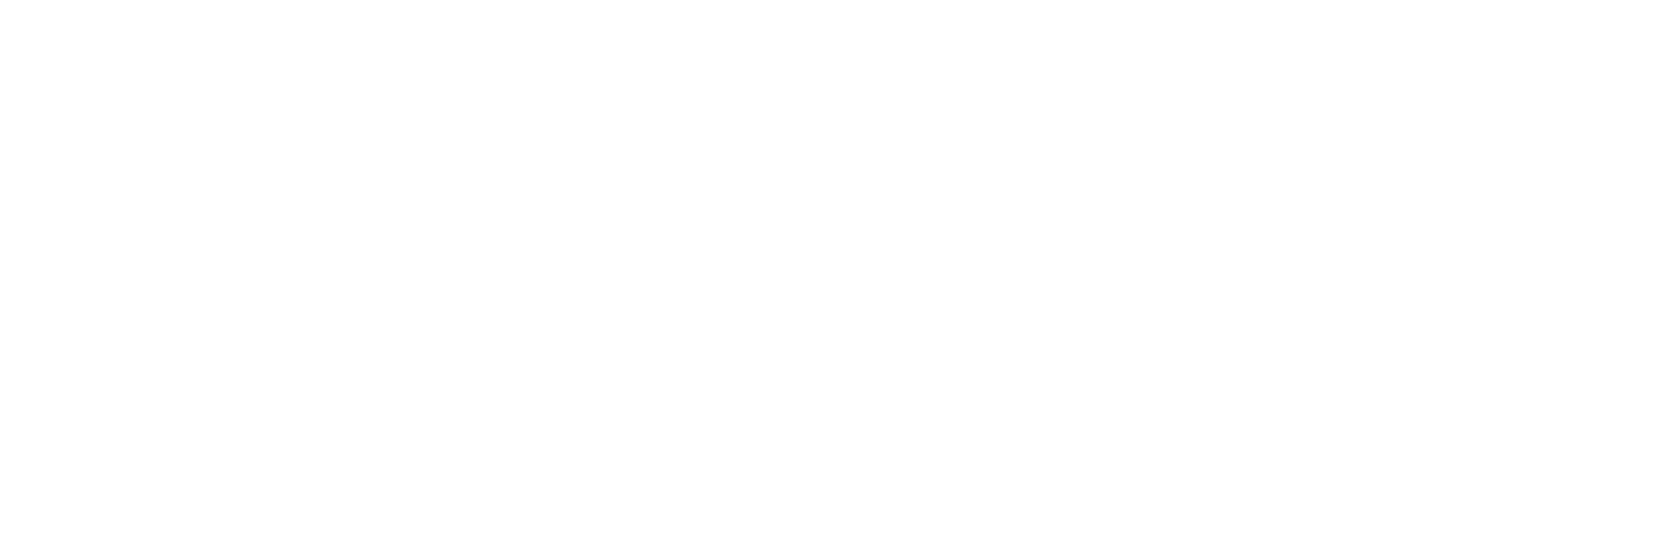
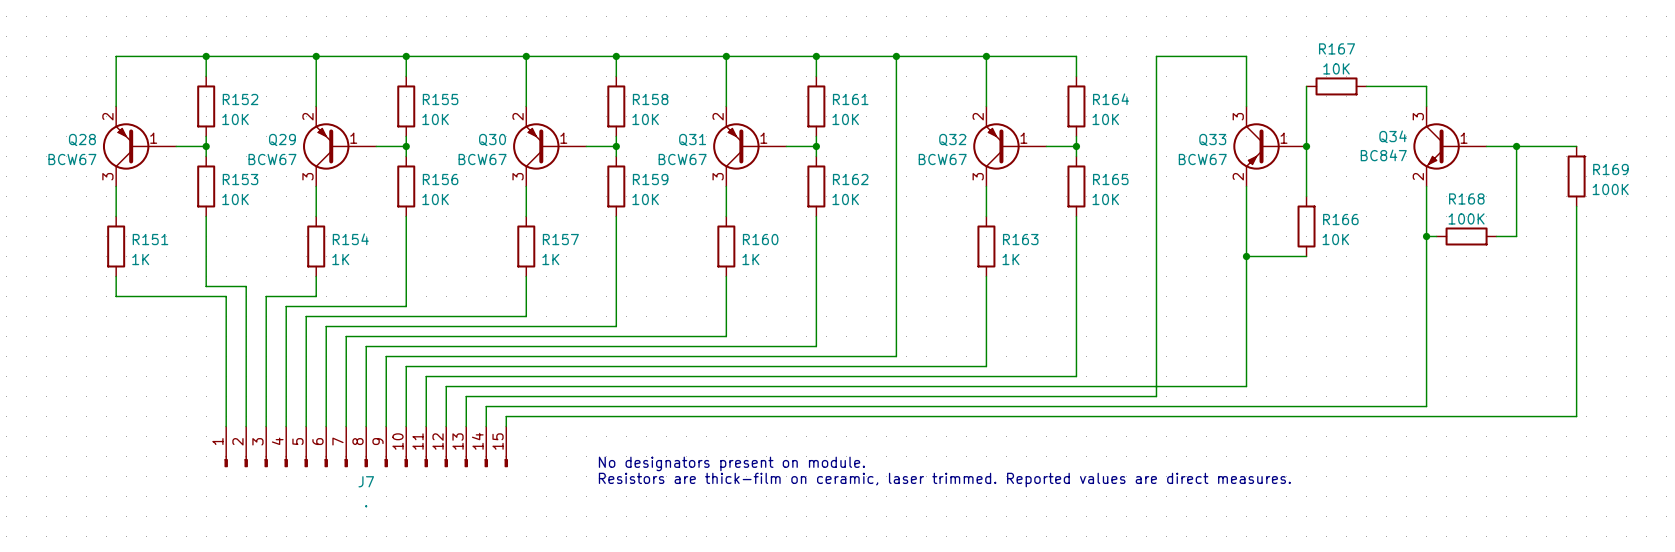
wire: none -> (206, 56) (206, 76)
junction: none -> (206, 56)
wire: none -> (316, 56) (316, 106)
junction: none -> (316, 56)
wire: none -> (406, 56) (406, 76)
junction: none -> (406, 56)
wire: none -> (526, 56) (526, 106)
junction: none -> (526, 56)
wire: none -> (616, 56) (616, 76)
junction: none -> (616, 56)
wire: none -> (726, 56) (726, 106)
junction: none -> (726, 56)
wire: none -> (816, 56) (816, 76)
junction: none -> (816, 56)
wire: none -> (896, 56) (896, 356) (386, 356) (386, 426)
junction: none -> (896, 56)
wire: none -> (986, 56) (986, 106)
junction: none -> (986, 56)
wire: none -> (1076, 76) (1076, 56) (116, 56) (116, 106)
wire: none -> (1306, 86) (1306, 196)
R167: none -> 10K (1336, 86)
wire: none -> (1366, 86) (1426, 86) (1426, 106)
R152: none -> 10K (206, 106)
R155: none -> 10K (406, 106)
R158: none -> 10K (616, 106)
R161: none -> 10K (816, 106)
R164: none -> 10K (1076, 106)
wire: none -> (1246, 106) (1246, 56) (1156, 56) (1156, 396) (466, 396) (466, 426)
wire: none -> (206, 136) (206, 156)
wire: none -> (406, 136) (406, 156)
wire: none -> (616, 136) (616, 156)
wire: none -> (816, 136) (816, 156)
wire: none -> (1076, 136) (1076, 156)
Q28: none -> BCW67 (139, 146)
wire: none -> (176, 146) (206, 146)
junction: none -> (206, 146)
Q29: none -> BCW67 (339, 146)
wire: none -> (376, 146) (406, 146)
junction: none -> (406, 146)
Q30: none -> BCW67 (549, 146)
wire: none -> (586, 146) (616, 146)
junction: none -> (616, 146)
Q31: none -> BCW67 (749, 146)
wire: none -> (786, 146) (816, 146)
junction: none -> (816, 146)
Q32: none -> BCW67 (1009, 146)
wire: none -> (1046, 146) (1076, 146)
junction: none -> (1076, 146)
Q33: none -> BCW67 (1269, 146)
junction: none -> (1306, 146)
Q34: none -> BC847 (1449, 146)
wire: none -> (1486, 146) (1576, 146)
wire: none -> (1516, 146) (1516, 236) (1496, 236)
junction: none -> (1516, 146)
R169: none -> 100K (1576, 176)
wire: none -> (116, 186) (116, 216)
R153: none -> 10K (206, 186)
wire: none -> (316, 186) (316, 216)
R156: none -> 10K (406, 186)
wire: none -> (526, 186) (526, 216)
R159: none -> 10K (616, 186)
wire: none -> (726, 186) (726, 216)
R162: none -> 10K (816, 186)
wire: none -> (986, 186) (986, 216)
R165: none -> 10K (1076, 186)
wire: none -> (1246, 186) (1246, 386) (446, 386) (446, 426)
wire: none -> (1426, 186) (1426, 406) (486, 406) (486, 426)
wire: none -> (1576, 206) (1576, 416) (506, 416) (506, 426)
wire: none -> (206, 216) (206, 286) (246, 286) (246, 426)
wire: none -> (406, 216) (406, 306) (286, 306) (286, 426)
wire: none -> (616, 216) (616, 326) (326, 326) (326, 426)
wire: none -> (816, 216) (816, 346) (366, 346) (366, 426)
wire: none -> (1076, 216) (1076, 376) (426, 376) (426, 426)
R166: none -> 10K (1306, 226)
wire: none -> (1426, 236) (1436, 236)
junction: none -> (1426, 236)
R168: none -> 100K (1466, 236)
R151: none -> 1K (116, 246)
R154: none -> 1K (316, 246)
R157: none -> 1K (526, 246)
R160: none -> 1K (726, 246)
R163: none -> 1K (986, 246)
wire: none -> (1246, 256) (1306, 256)
junction: none -> (1246, 256)
wire: none -> (116, 276) (116, 296) (226, 296) (226, 426)
wire: none -> (316, 276) (316, 296) (266, 296) (266, 426)
wire: none -> (526, 276) (526, 316) (306, 316) (306, 426)
wire: none -> (726, 276) (726, 336) (346, 336) (346, 426)
wire: none -> (986, 276) (986, 366) (406, 366) (406, 426)
J7: none -> . (366, 446)
text: none -> No designators present on module. (731, 463)
text: none -> Resistors are thick-film on ceramic, laser trimmed. Reported values are direct measures. (944, 480)

